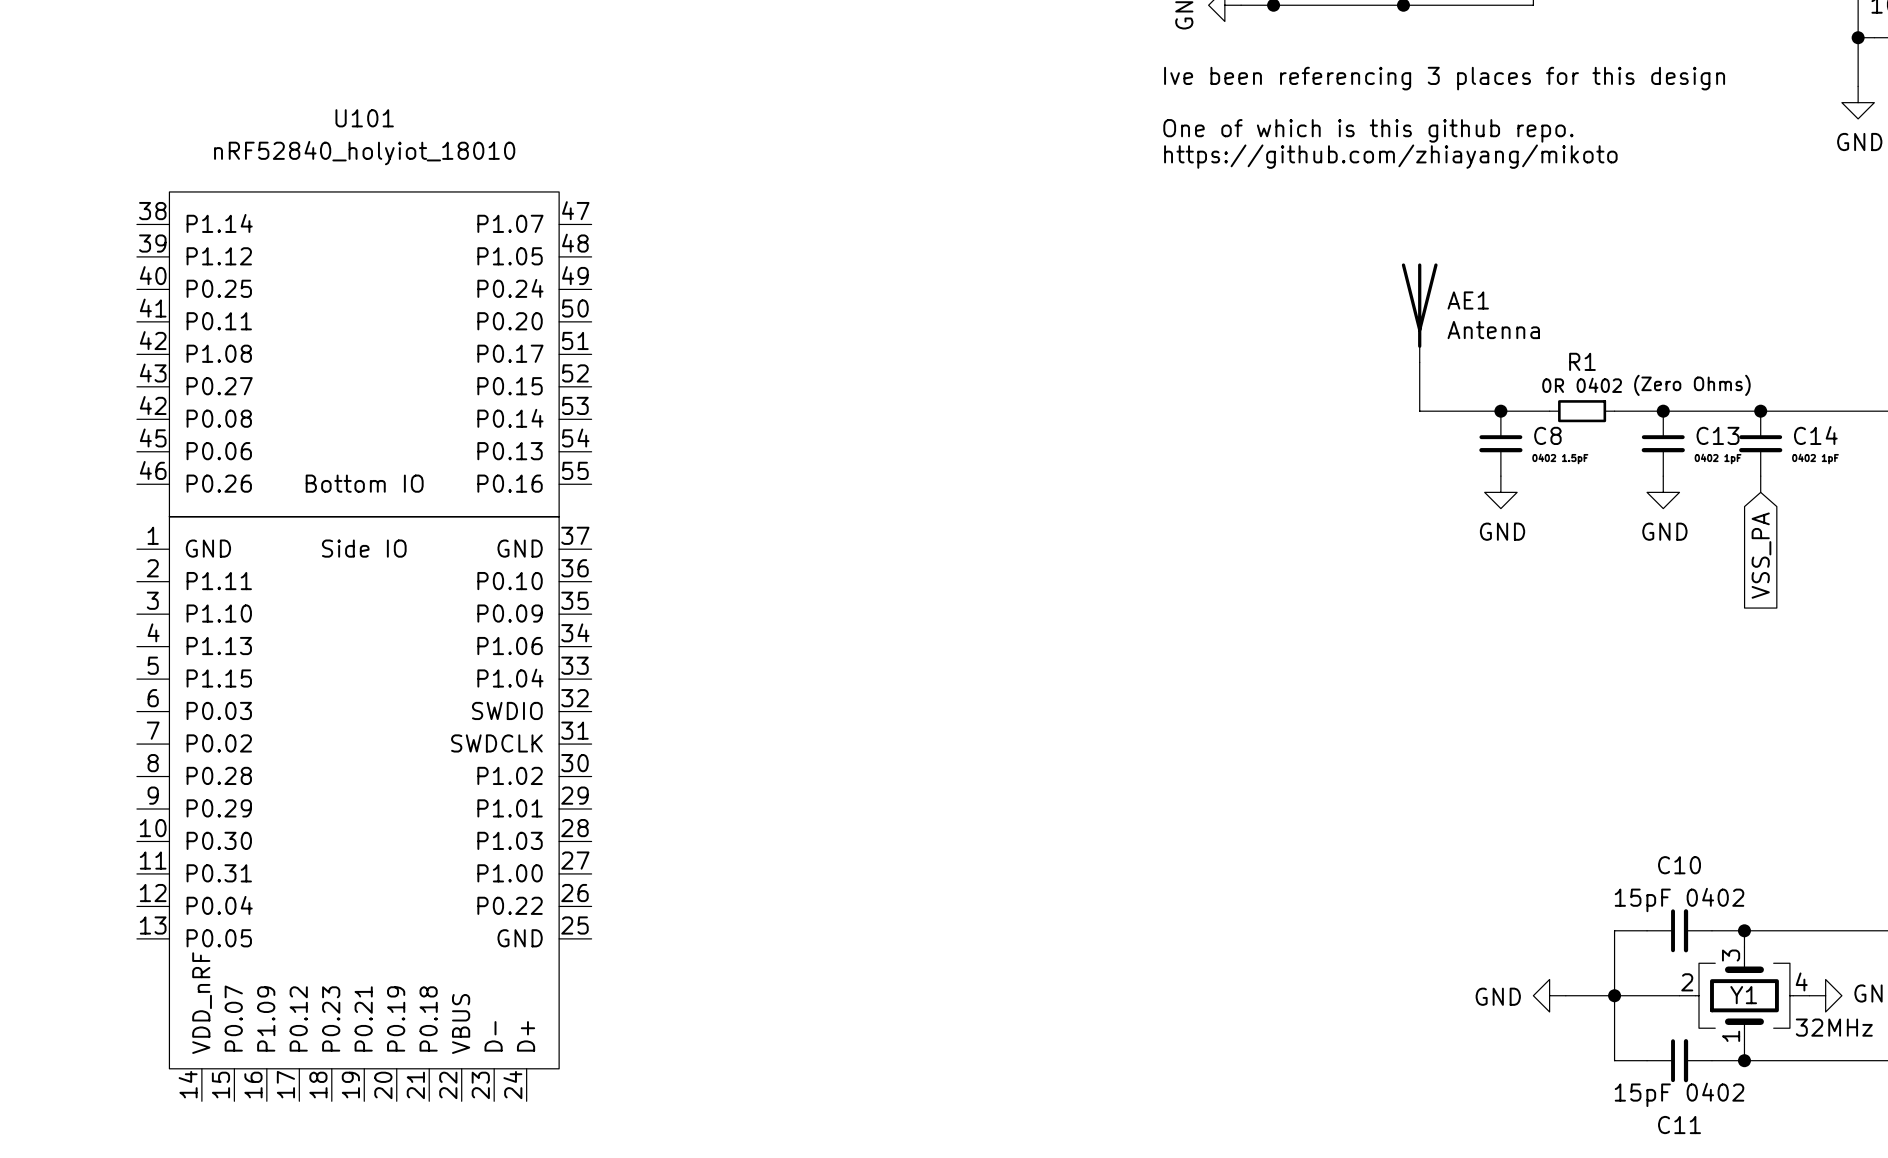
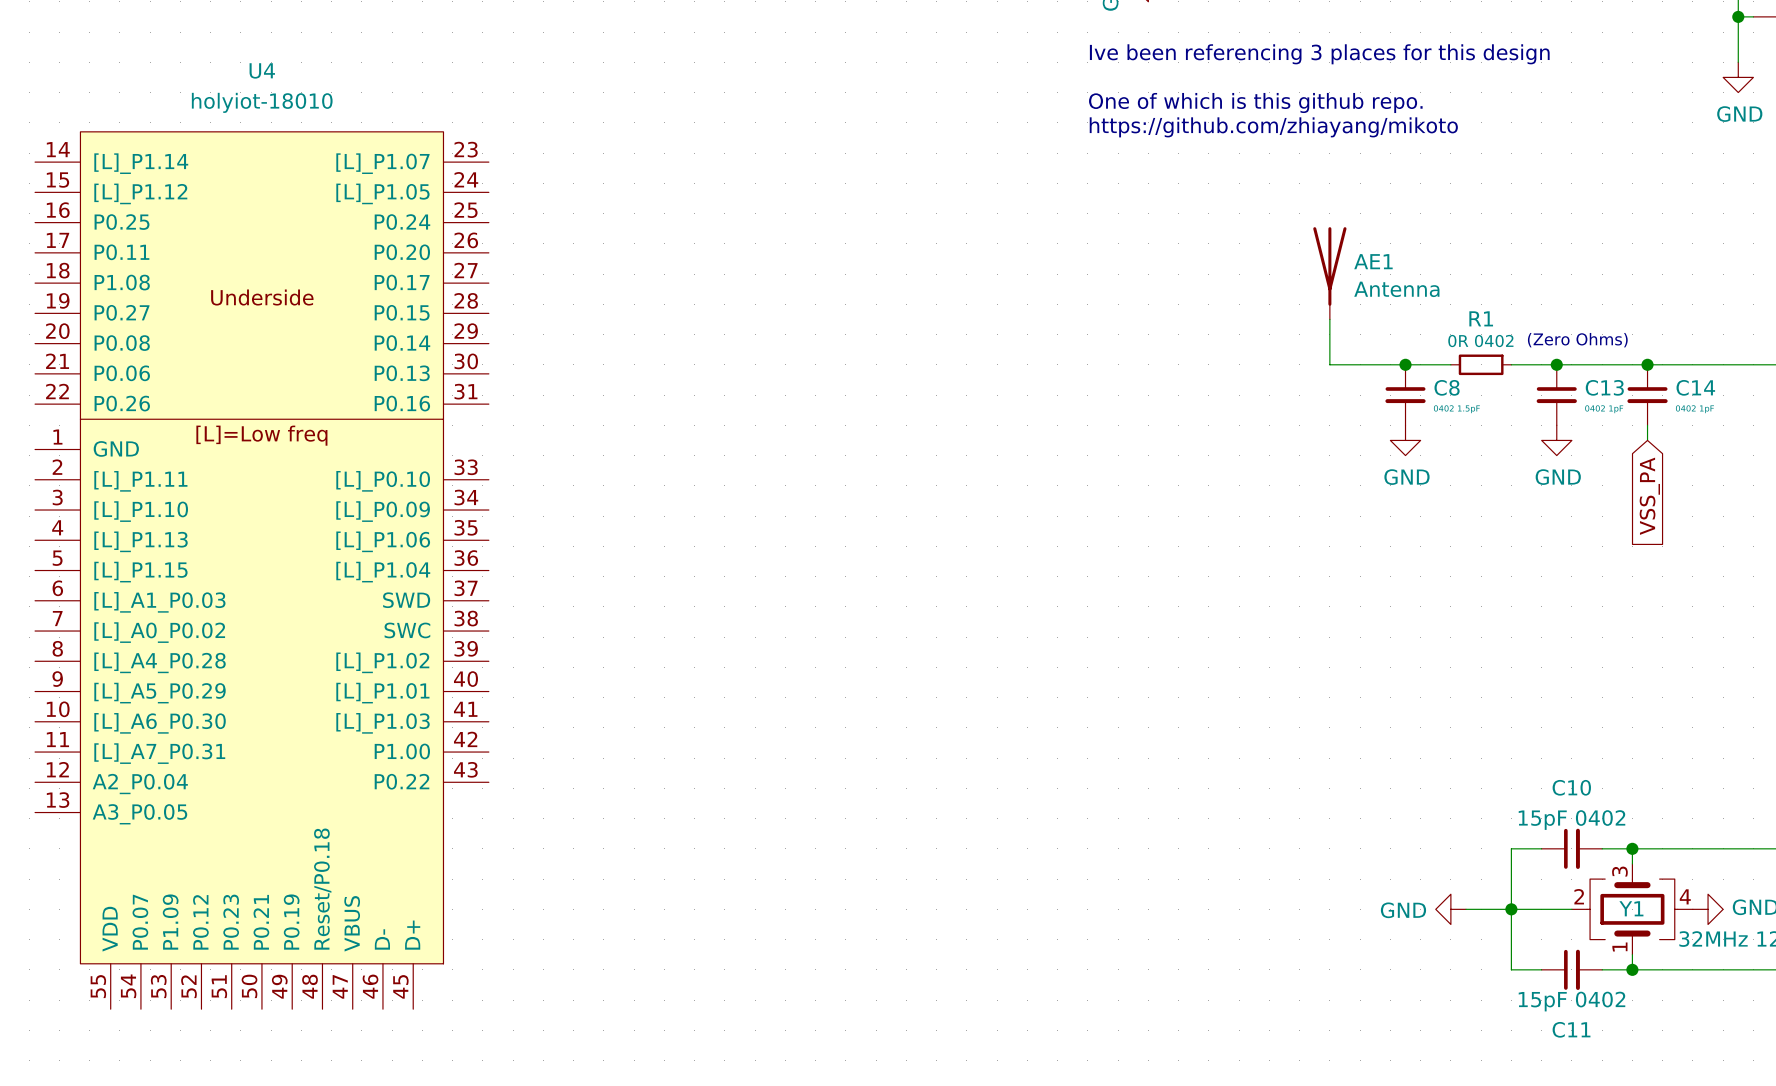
U4: none -> holyiot-18010 (261, 570)
U101: nRF52840_holyiot_18010 (364, 646) -> none

